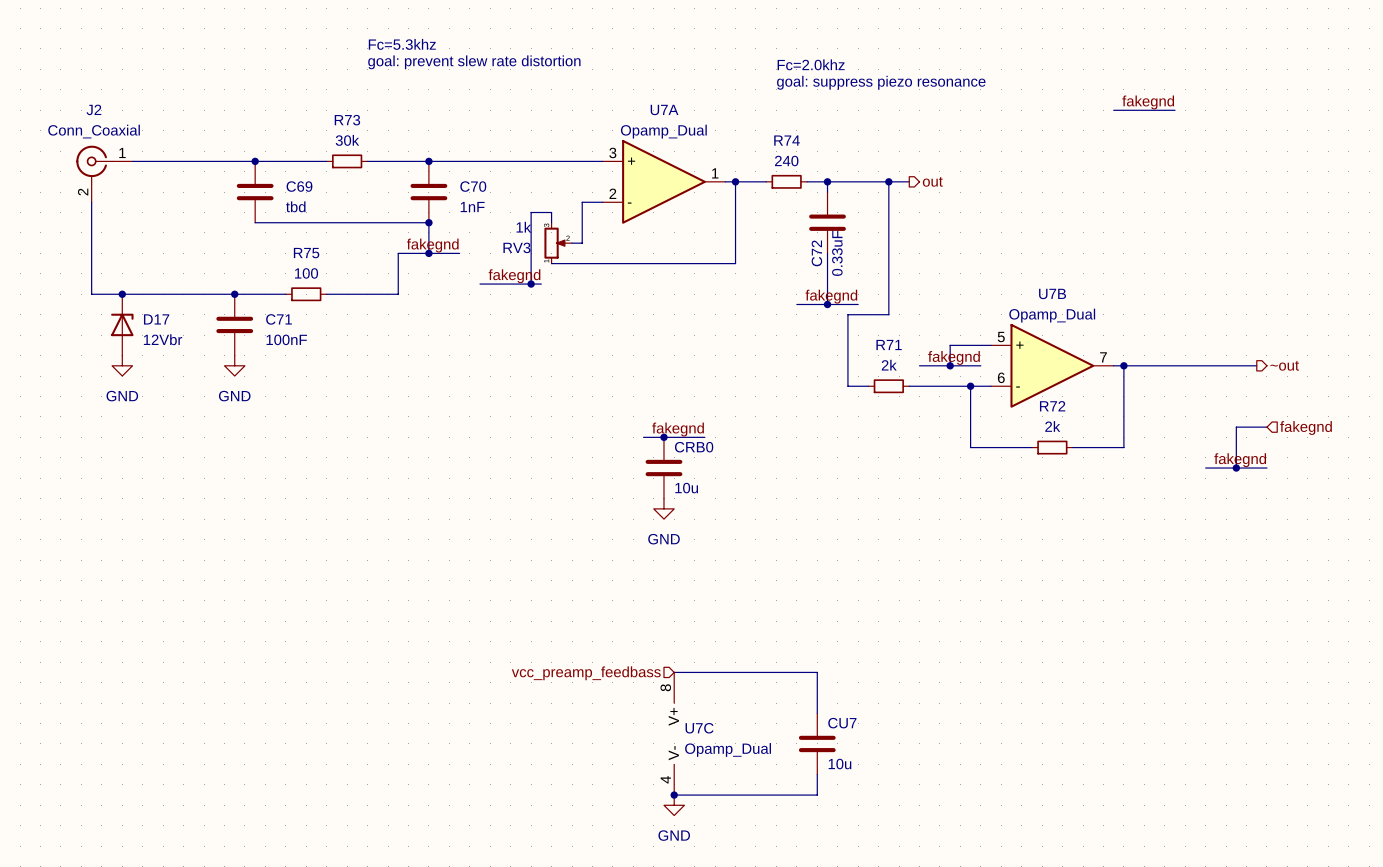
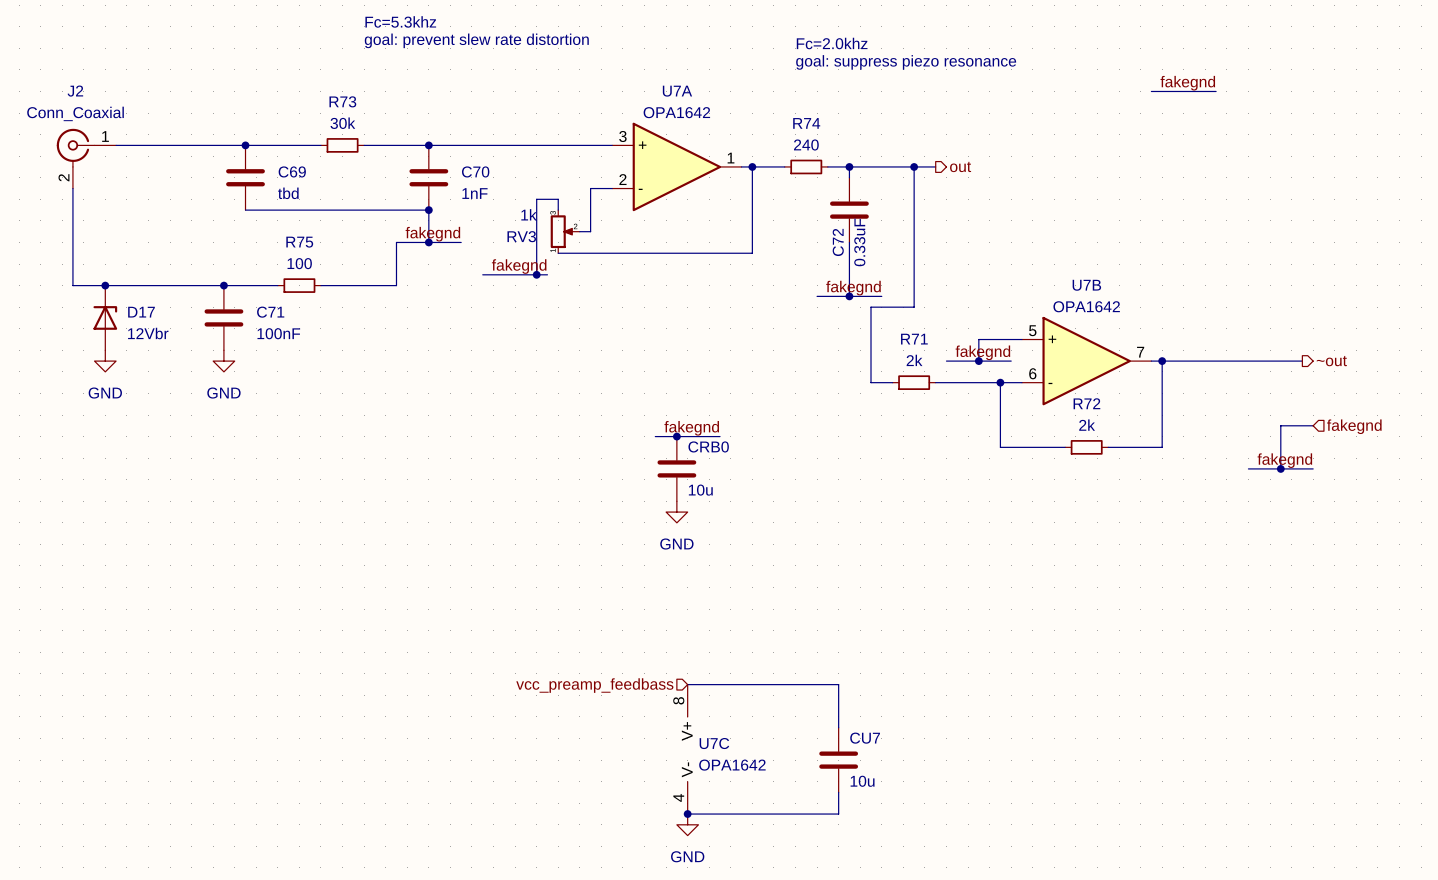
U7A value: Opamp_Dual (663, 131) -> OPA1642 (676, 112)
U7B value: Opamp_Dual (1052, 315) -> OPA1642 (1086, 306)
U7C value: Opamp_Dual (728, 749) -> OPA1642 (732, 765)

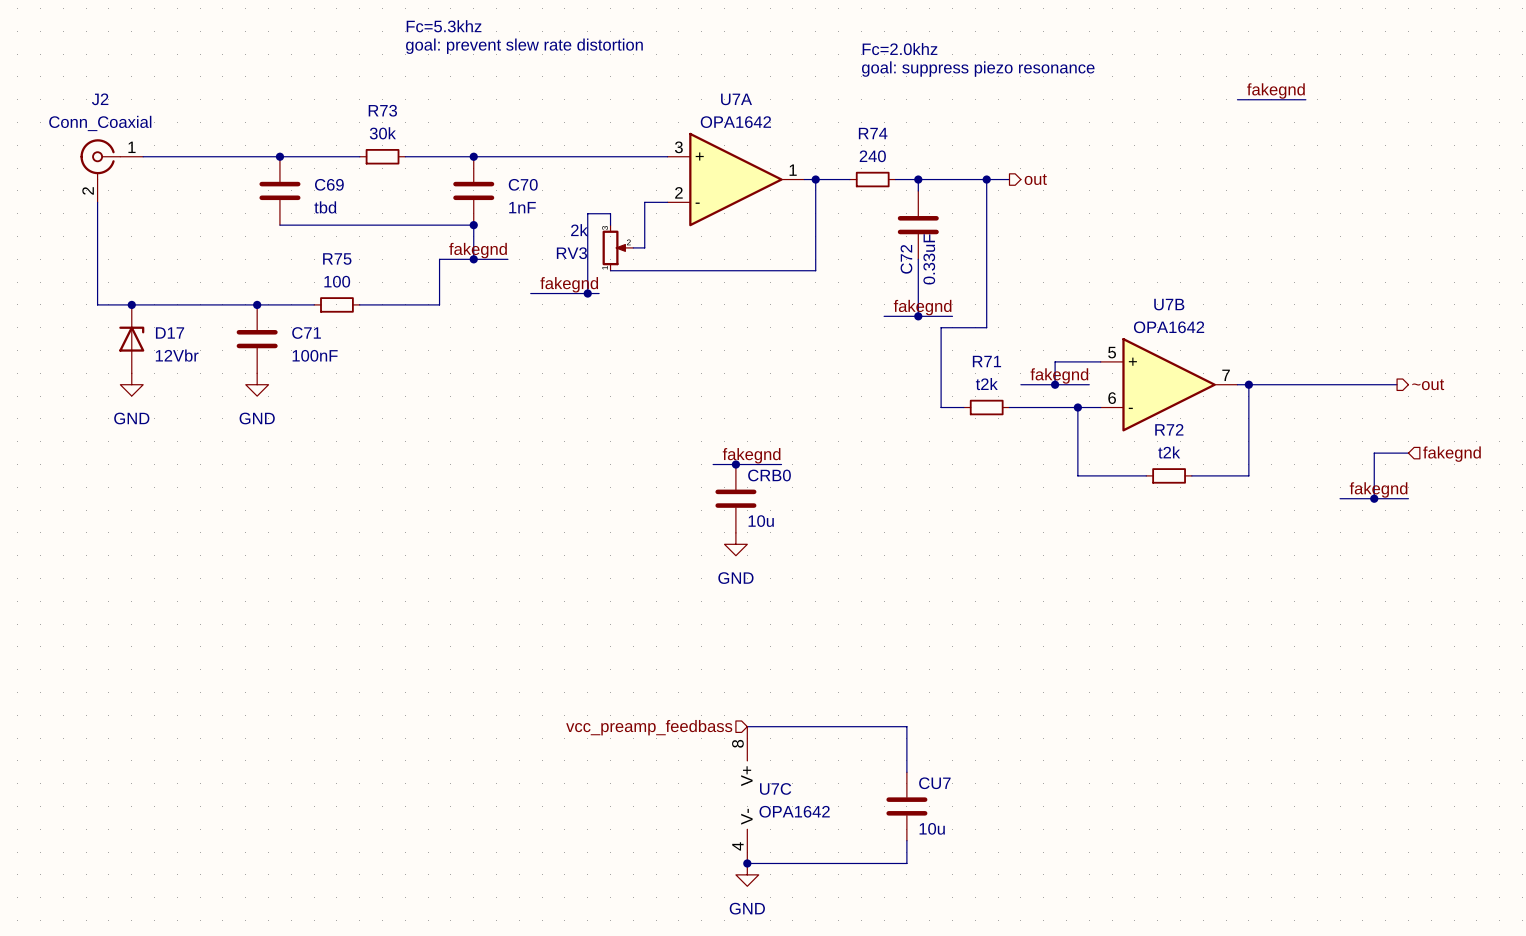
RV3 value: 1k (529, 214) -> 2k (579, 230)
R71 value: 2k (914, 360) -> t2k (986, 384)
R72 value: 2k (1087, 425) -> t2k (1169, 452)

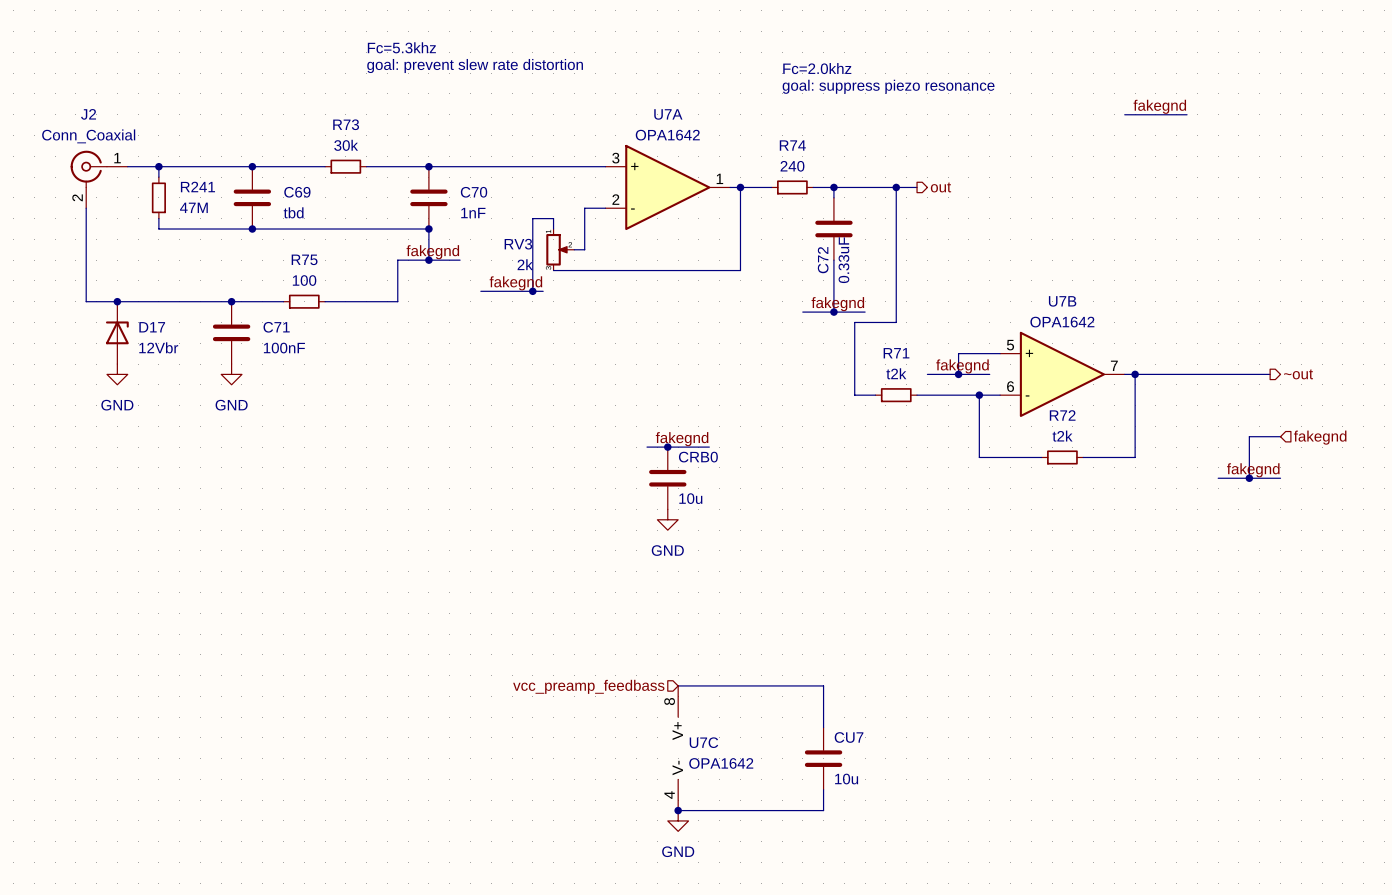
wire: none -> (158, 166) (158, 177)
junction: none -> (158, 166)
R241: none -> 47M (158, 197)
wire: none -> (158, 218) (158, 229) (252, 229)
junction: none -> (252, 229)
RV3 flip: as is (613, 247) -> up-down (556, 249)

